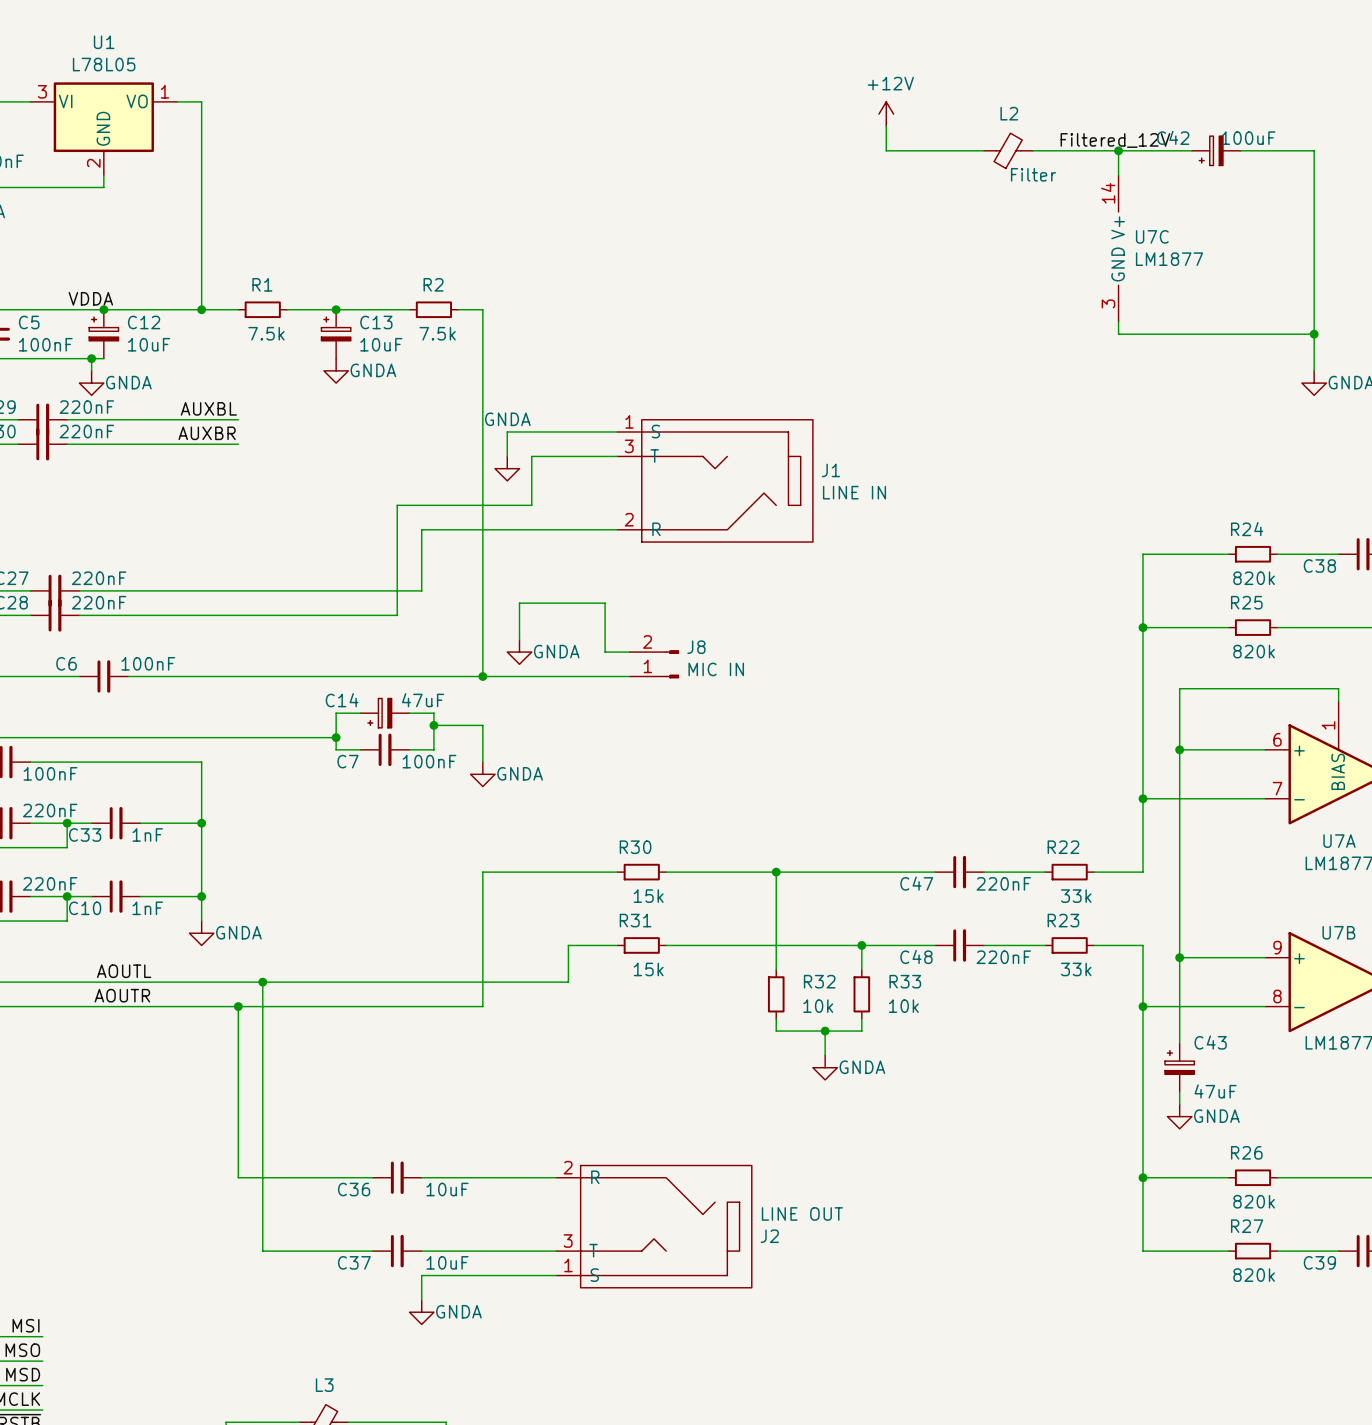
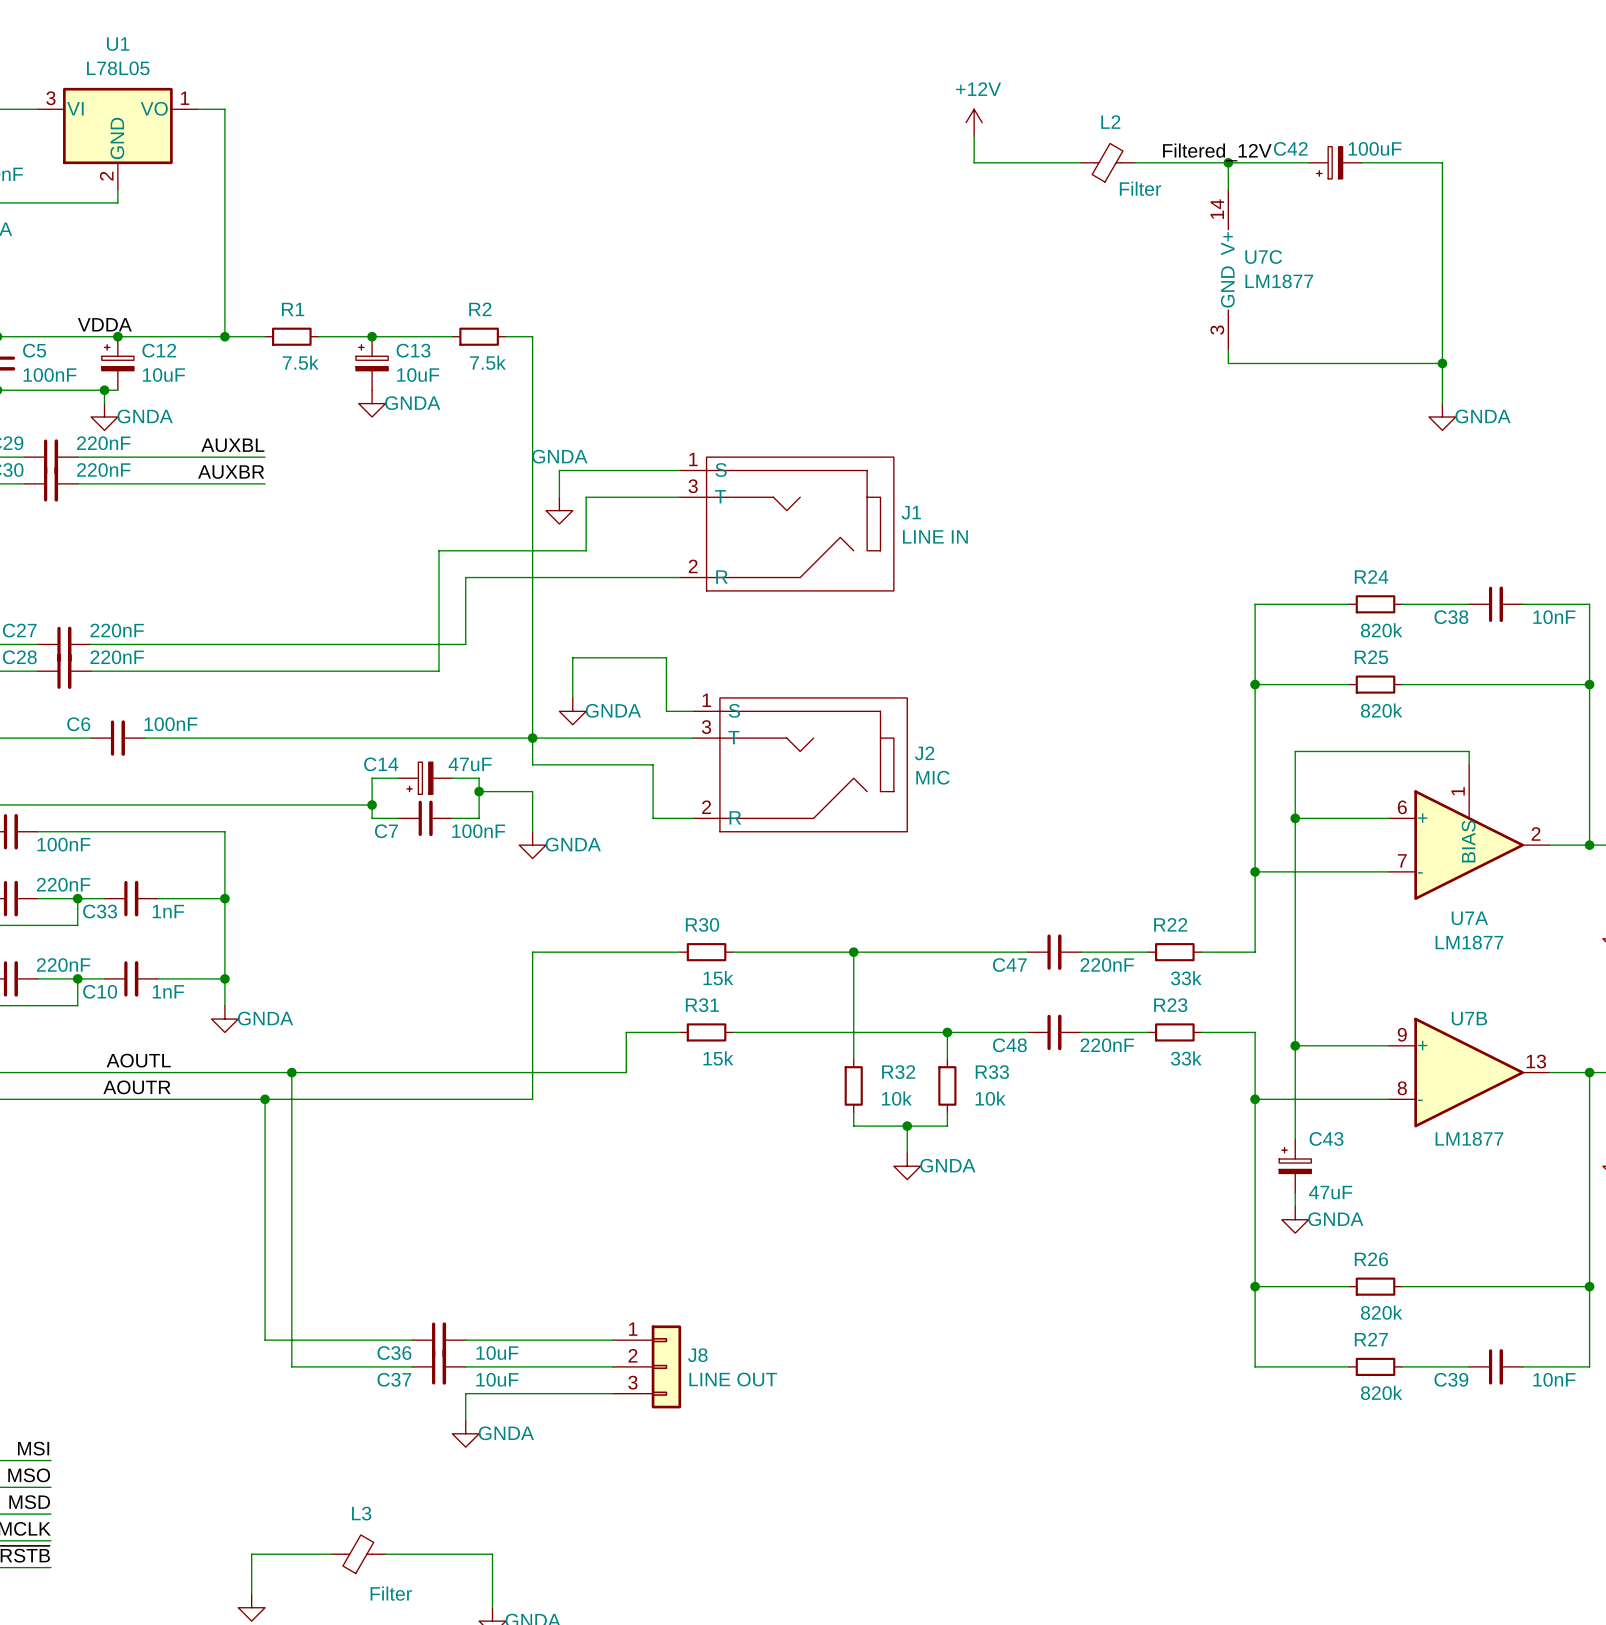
J8 symbol: [629, 650, 680, 679] -> [612, 1325, 682, 1409]
J8 value: MIC IN (716, 669) -> LINE OUT (733, 1379)
wire: none -> (532, 738) (532, 764) (653, 764) (653, 818) (693, 818)
wire: (238, 1177) (372, 1177) -> (265, 1286) (265, 1340) (412, 1340)
C36 position: (397, 1177) -> (438, 1340)
wire: (421, 1177) (556, 1177) -> (465, 1340) (612, 1340)
J2 value: LINE OUT (802, 1213) -> MIC (932, 777)
J2 position: (653, 1226) -> (800, 764)
J2 flip: as is (666, 1226) -> up-down (813, 764)

